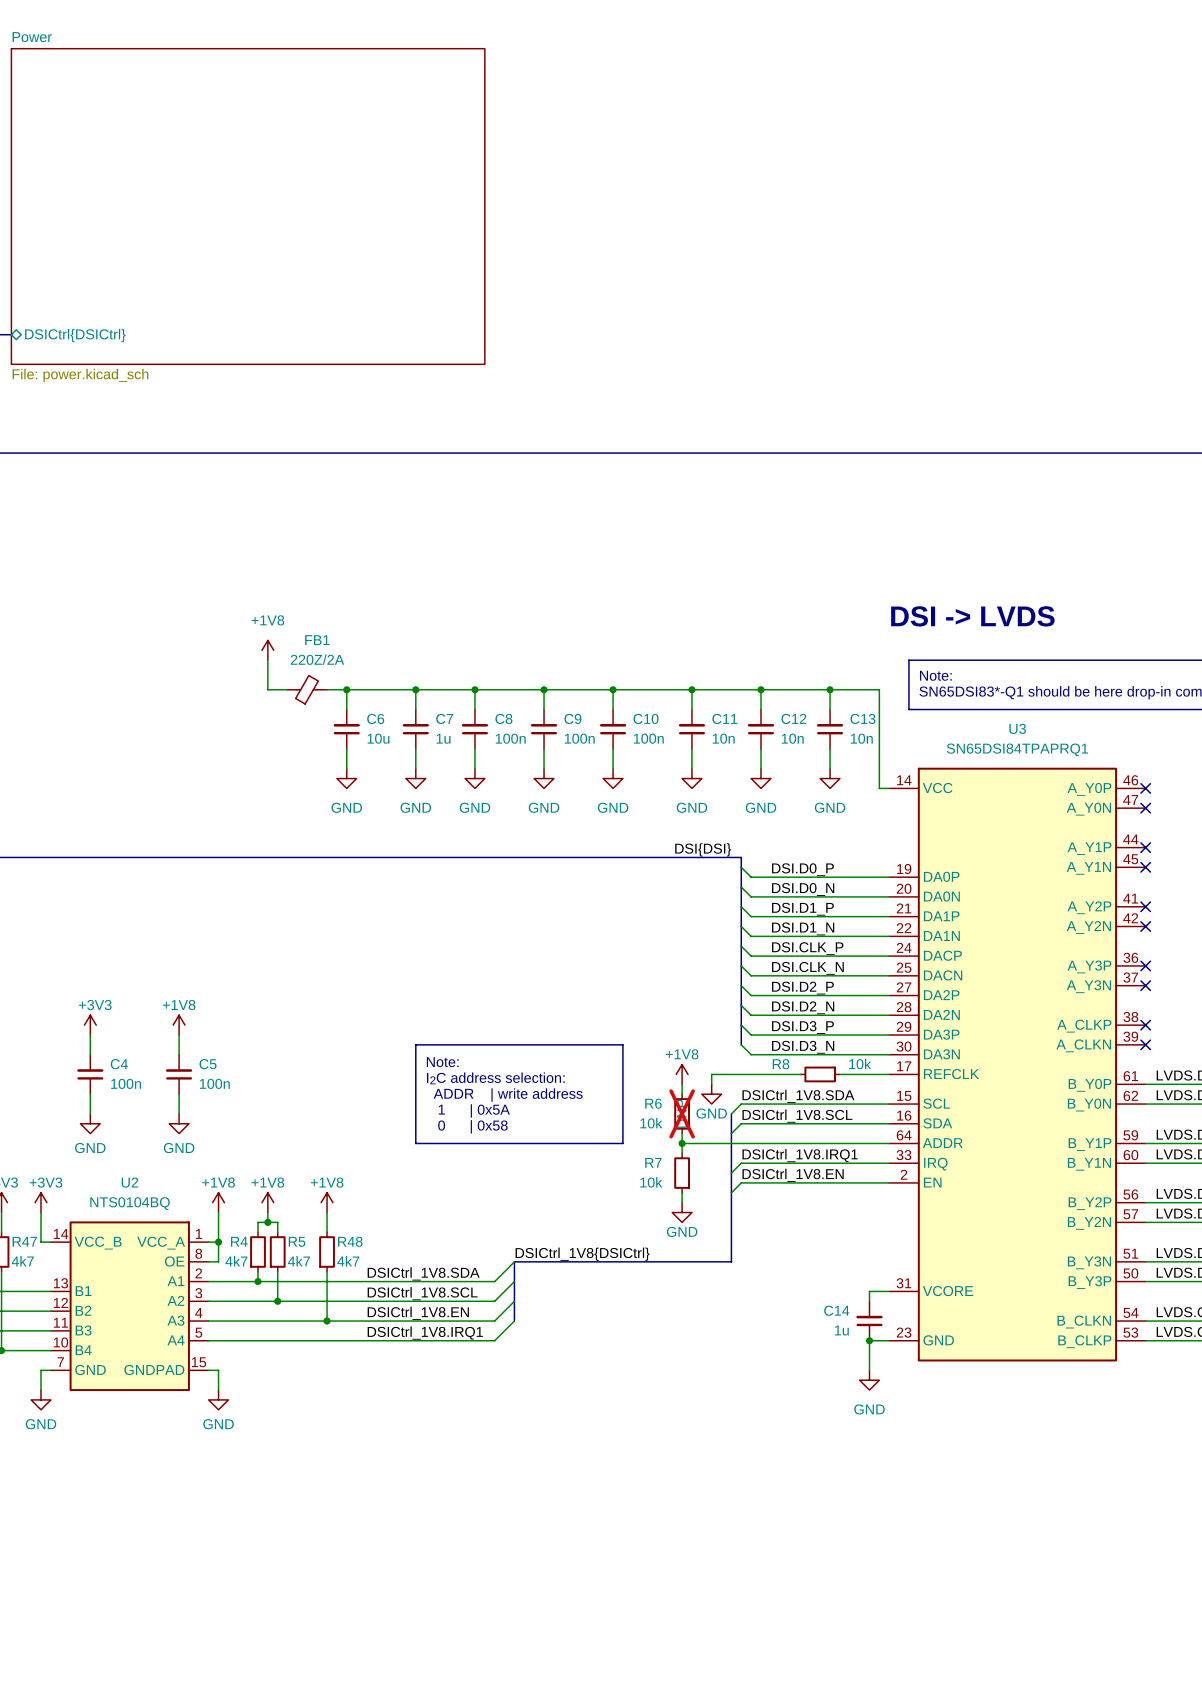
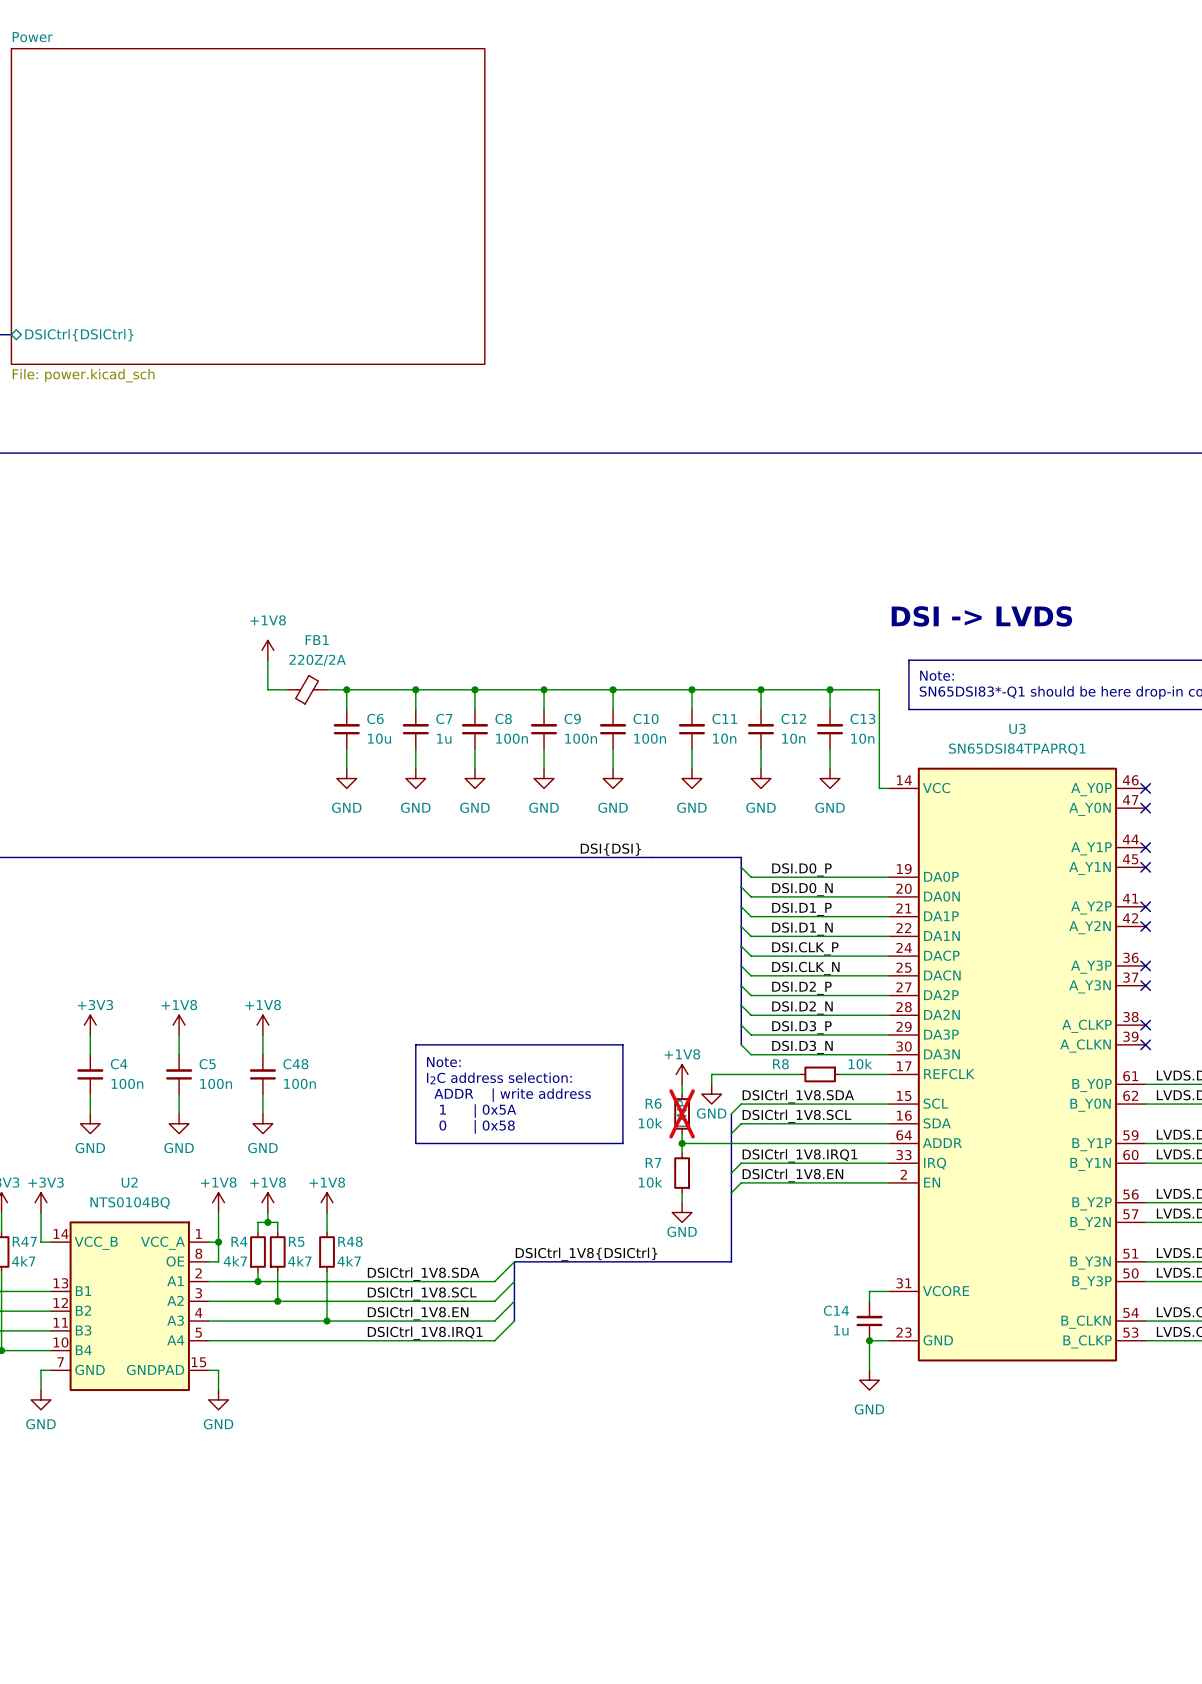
label position: DSI{DSI} (703, 849) -> DSI{DSI} (610, 849)
power symbol: none -> +1V8 (262, 1025)
wire: none -> (262, 1035) (262, 1054)
C48: none -> (262, 1074)
wire: none -> (262, 1094) (262, 1113)
power symbol: none -> GND (262, 1123)

